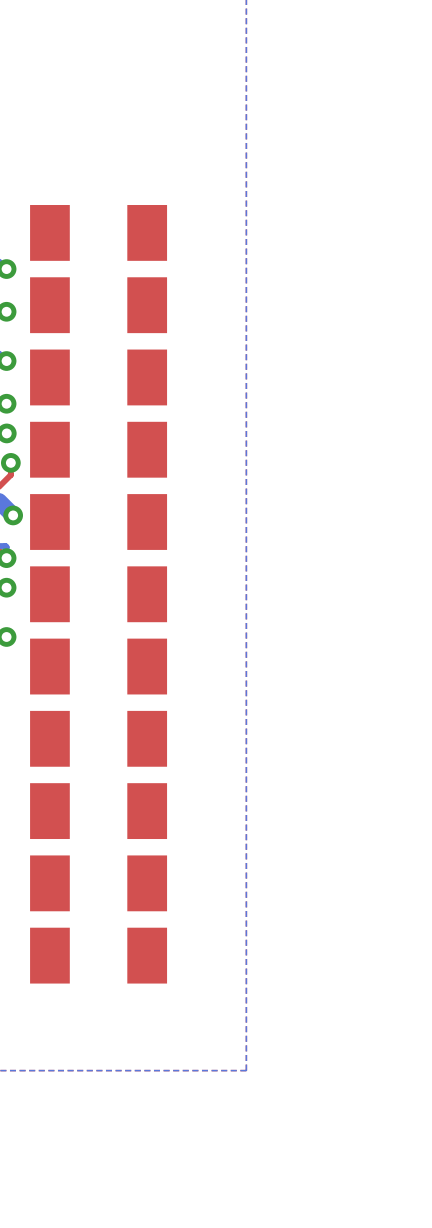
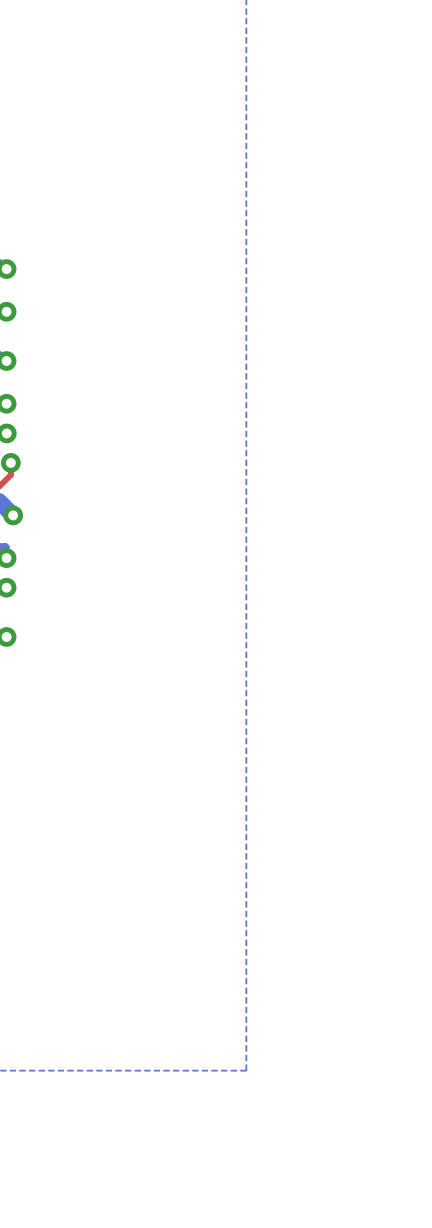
part: (98, 232) -> none
part: (98, 305) -> none
part: (98, 377) -> none
part: (98, 449) -> none
part: (98, 522) -> none
part: (98, 594) -> none
part: (98, 666) -> none
part: (98, 738) -> none
part: (98, 811) -> none
part: (98, 883) -> none
part: (98, 955) -> none

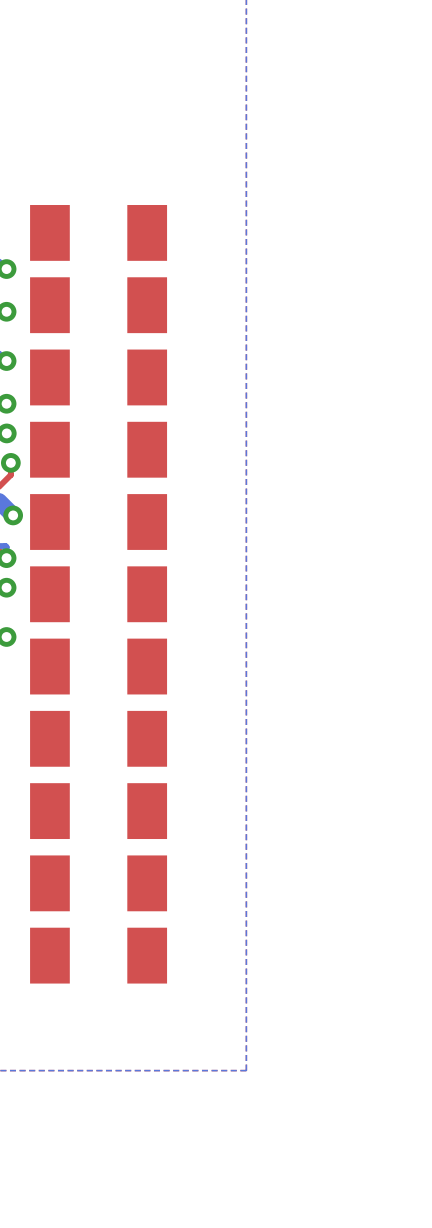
part: none -> (98, 232)
part: none -> (98, 305)
part: none -> (98, 377)
part: none -> (98, 449)
part: none -> (98, 522)
part: none -> (98, 594)
part: none -> (98, 666)
part: none -> (98, 738)
part: none -> (98, 811)
part: none -> (98, 883)
part: none -> (98, 955)

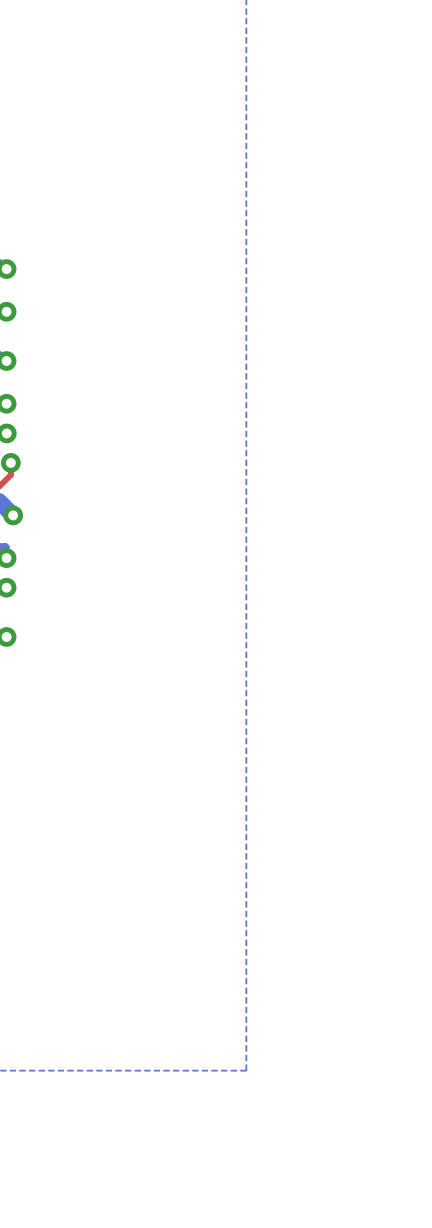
part: (98, 232) -> none
part: (98, 305) -> none
part: (98, 377) -> none
part: (98, 449) -> none
part: (98, 522) -> none
part: (98, 594) -> none
part: (98, 666) -> none
part: (98, 738) -> none
part: (98, 811) -> none
part: (98, 883) -> none
part: (98, 955) -> none

